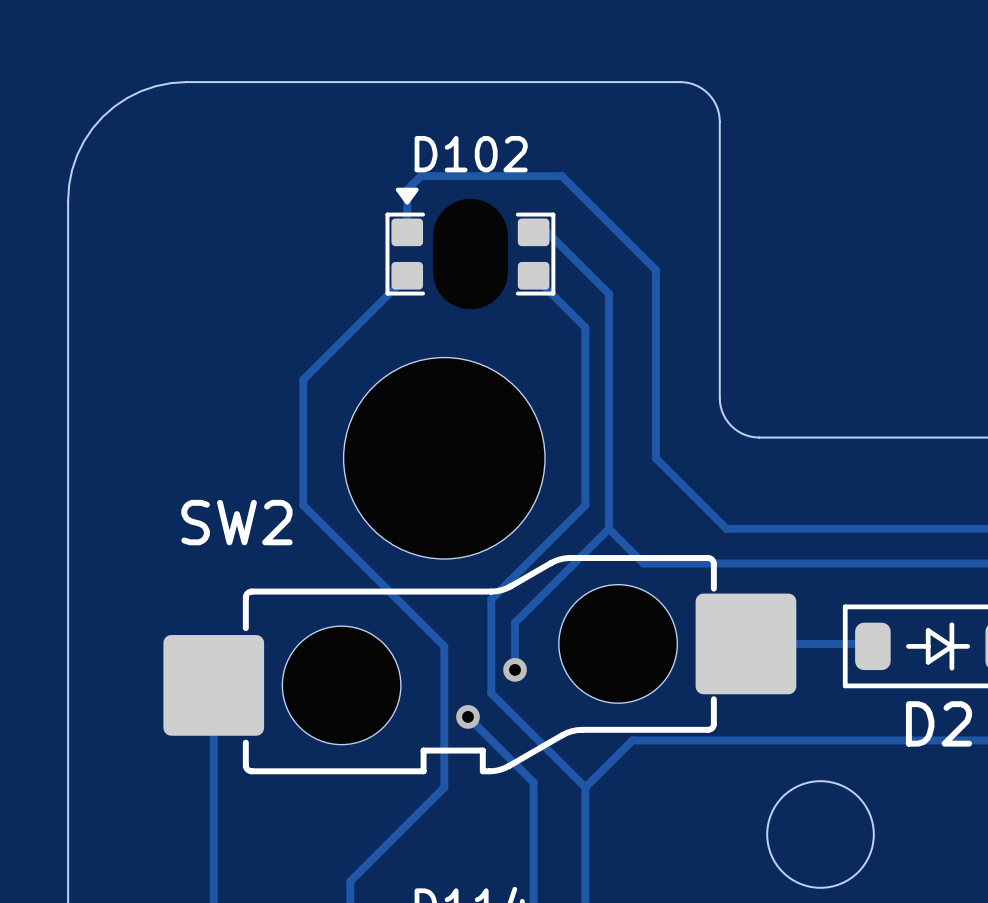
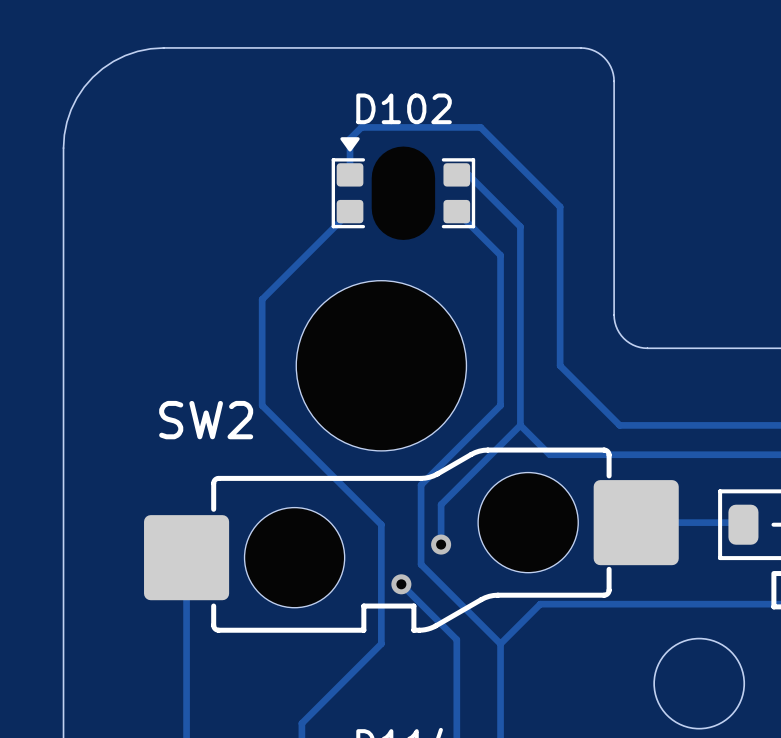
SW2 footprint: [163, 357, 797, 775] -> [144, 280, 679, 633]

